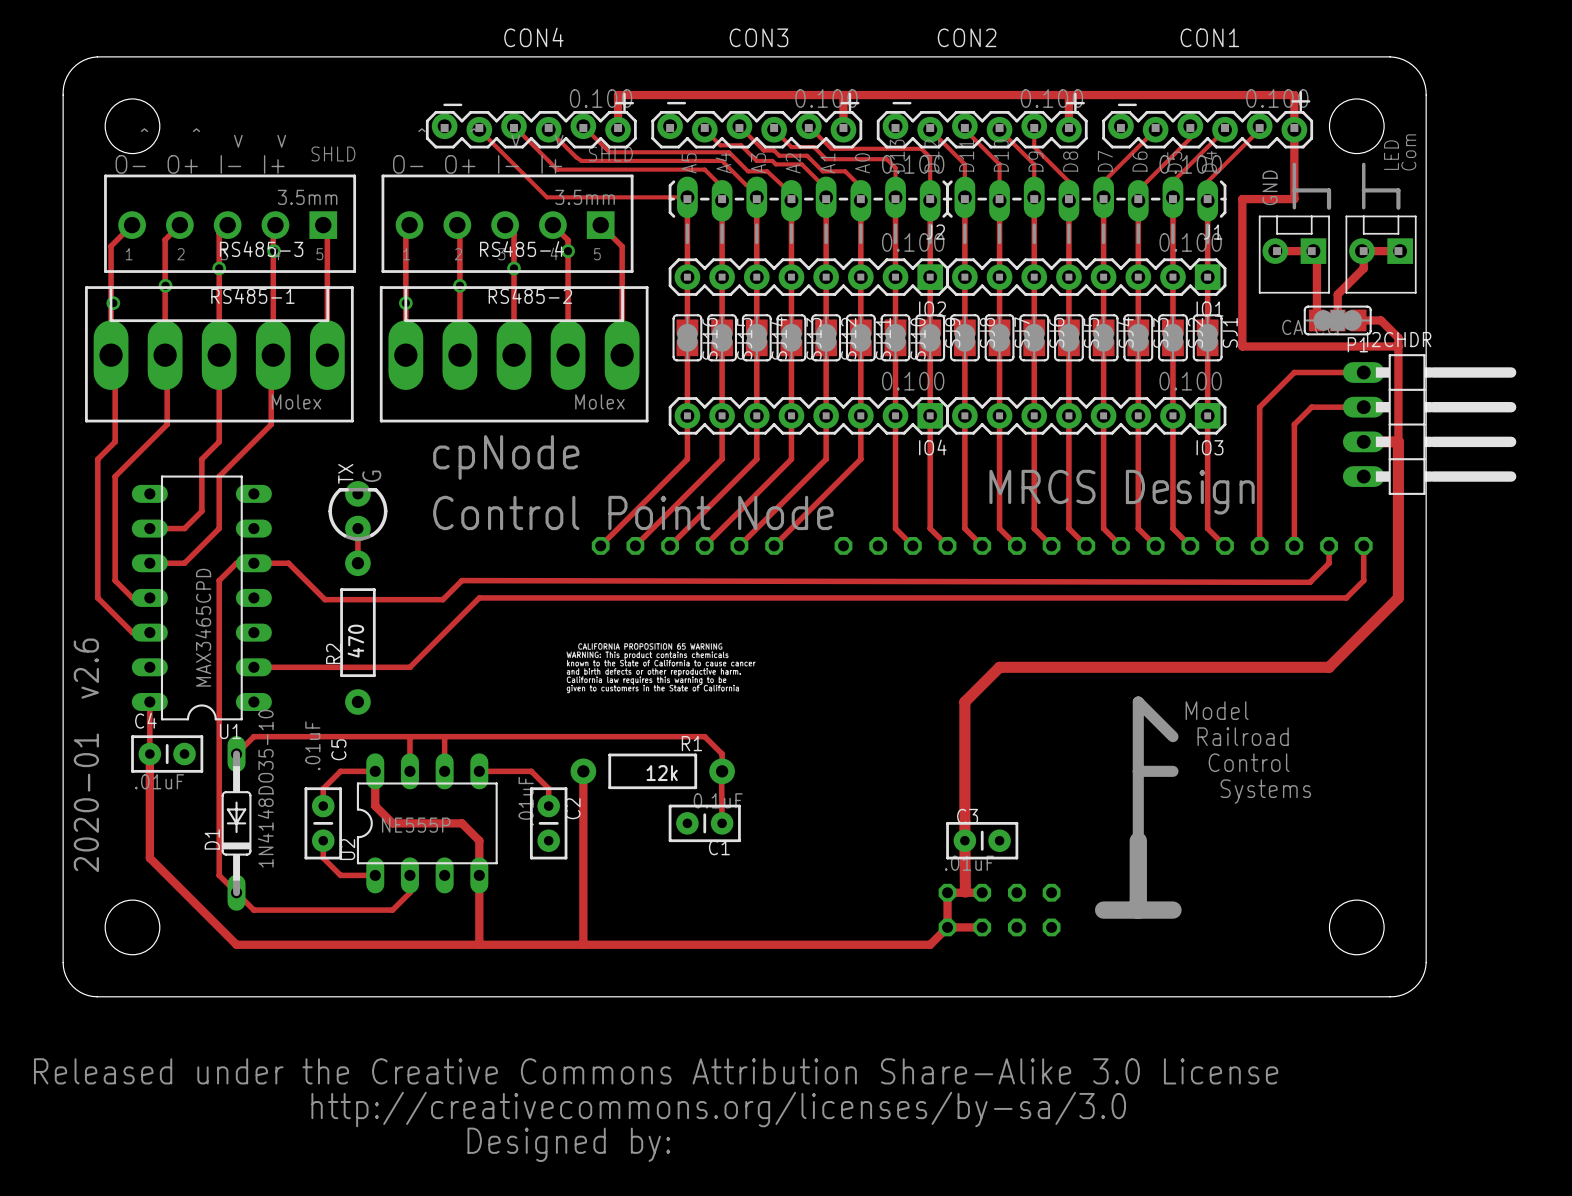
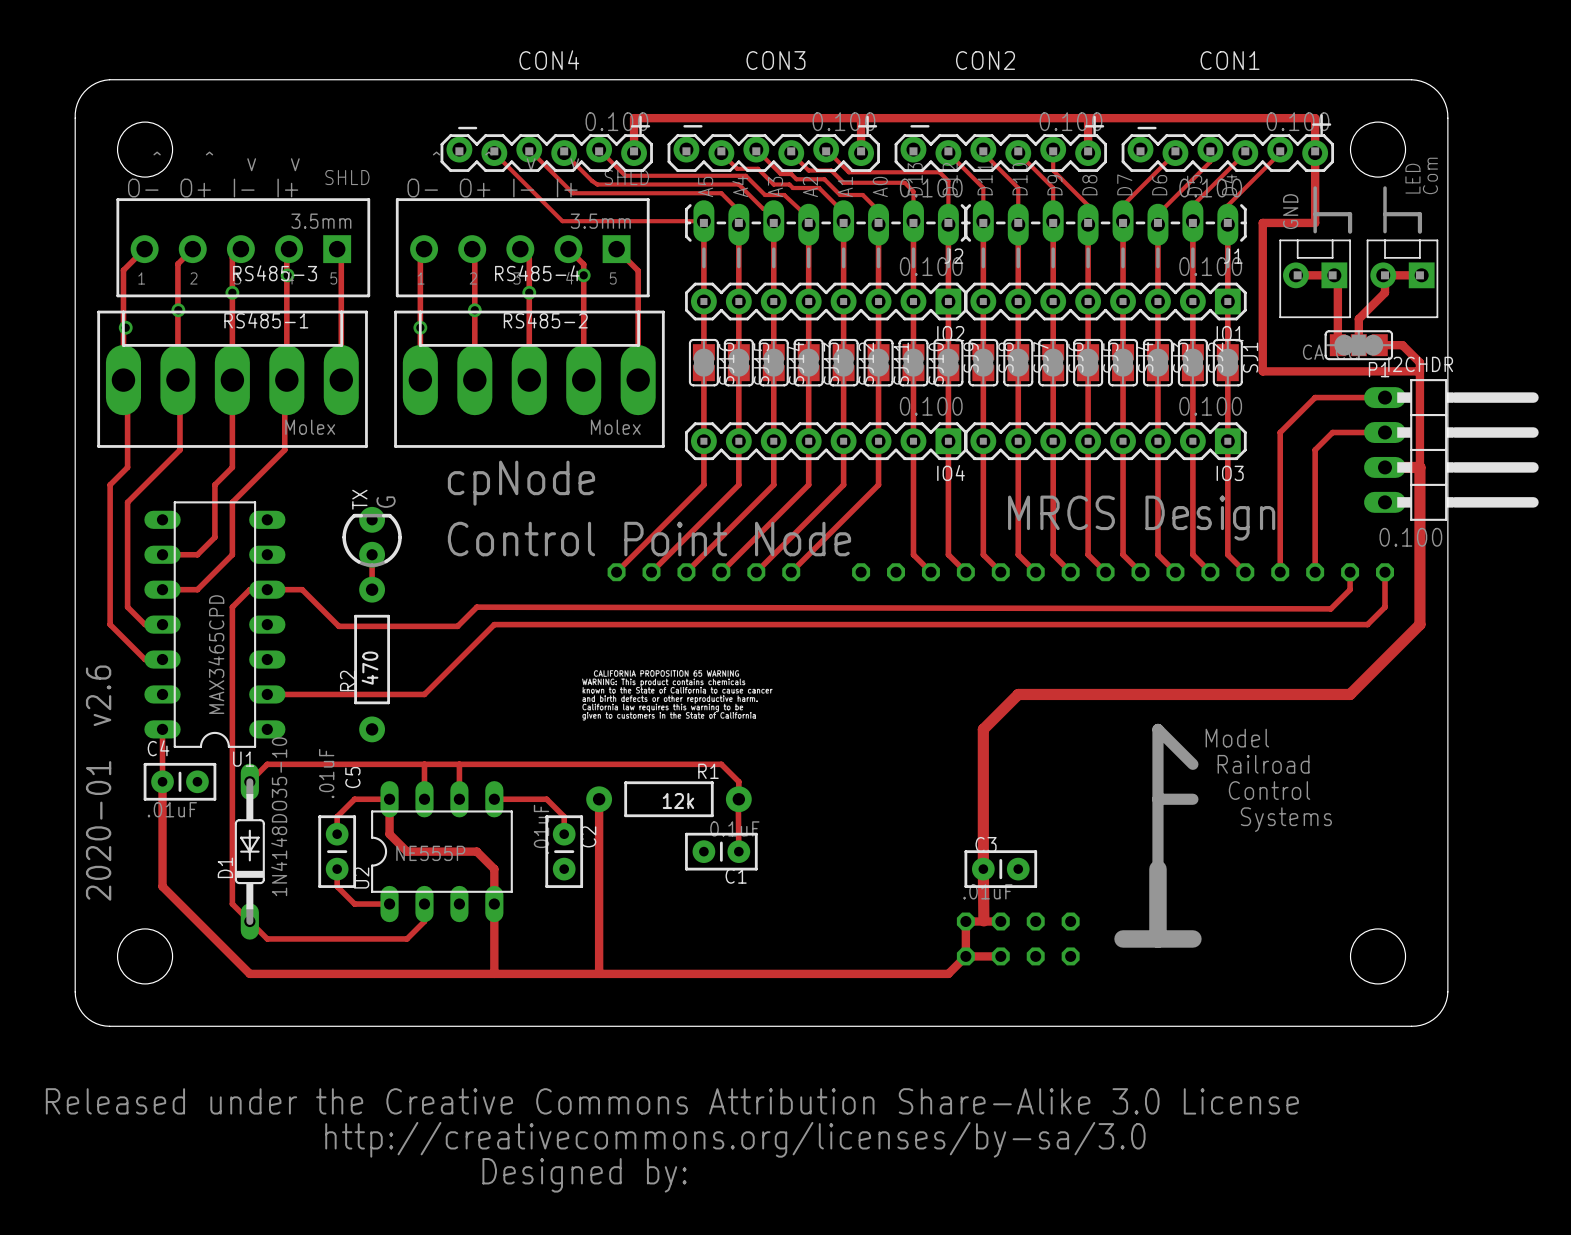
I2CHDR value: none -> 0.100 (1410, 537)

